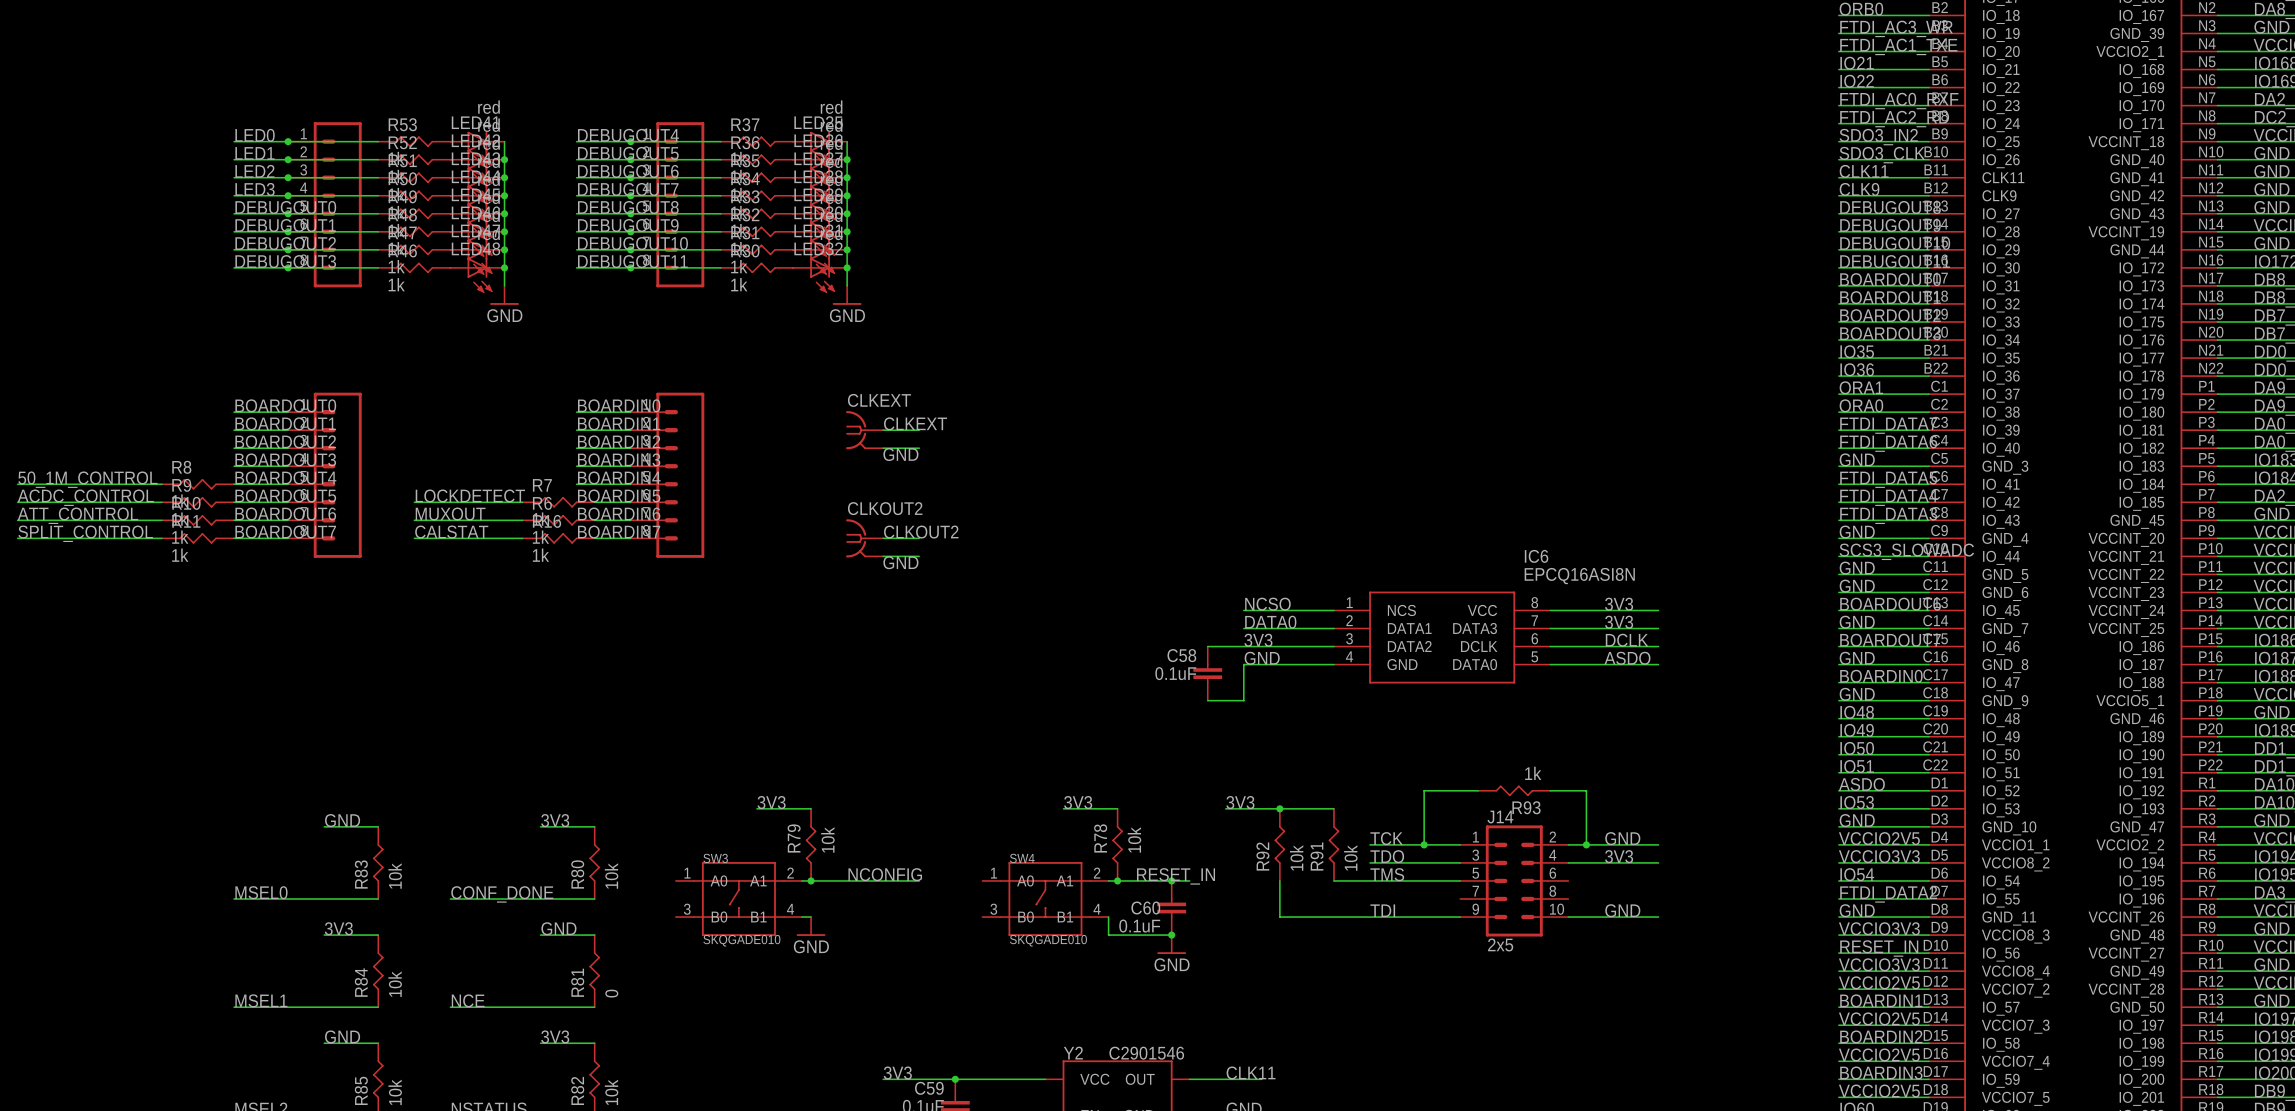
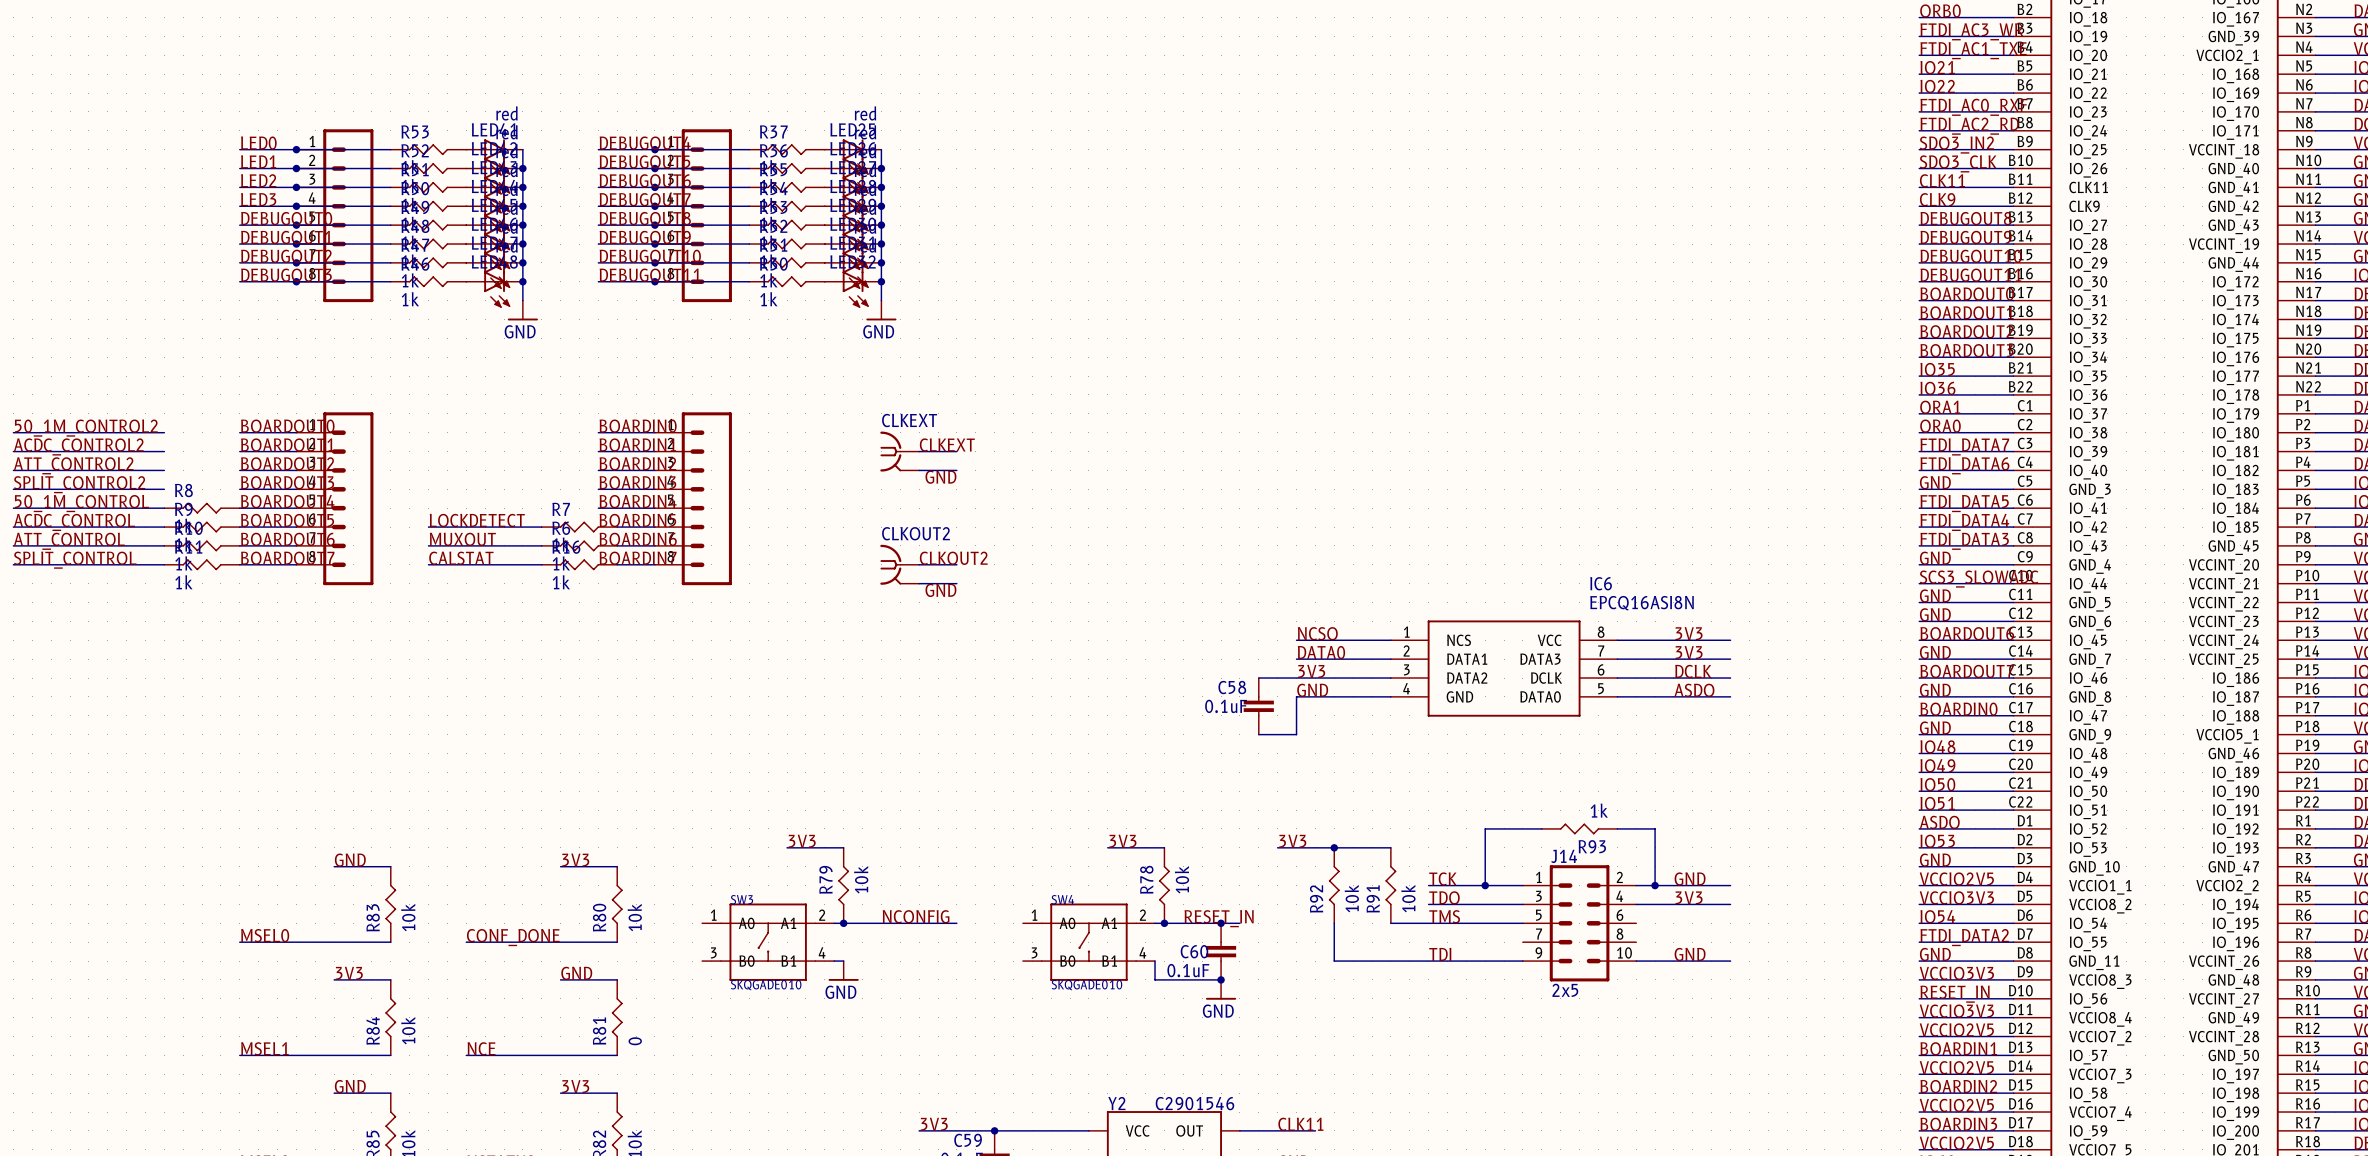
label: none -> 50_1M_CONTROL2 (86, 428)
wire: none -> (13, 432) (164, 432)
label: none -> ACDC_CONTROL2 (78, 446)
wire: none -> (13, 451) (164, 451)
label: none -> ATT_CONTROL2 (73, 465)
wire: none -> (13, 470) (164, 470)
label: none -> SPLIT_CONTROL2 (79, 484)
wire: none -> (13, 489) (164, 489)

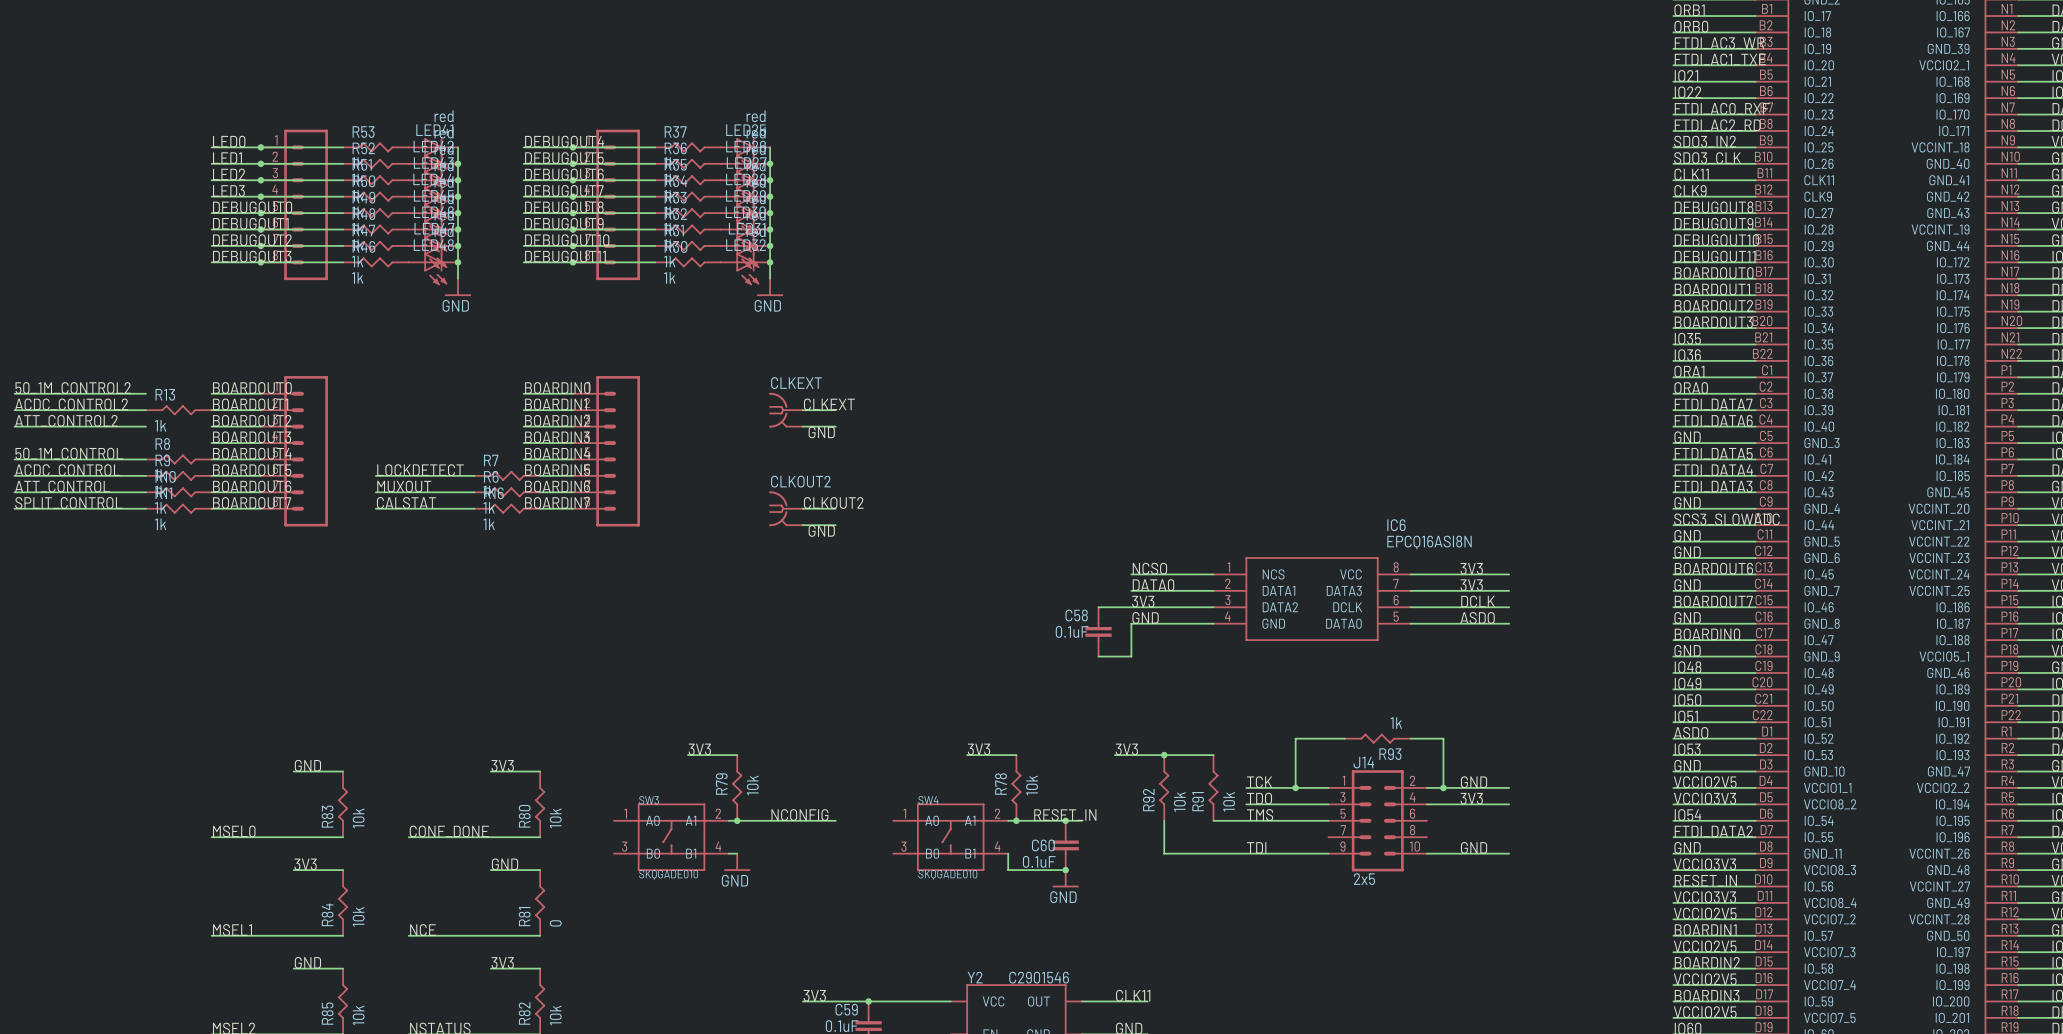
R13: none -> 1k (178, 410)
label: SPLIT_CONTROL2 (79, 484) -> none
wire: (13, 489) (164, 489) -> none

